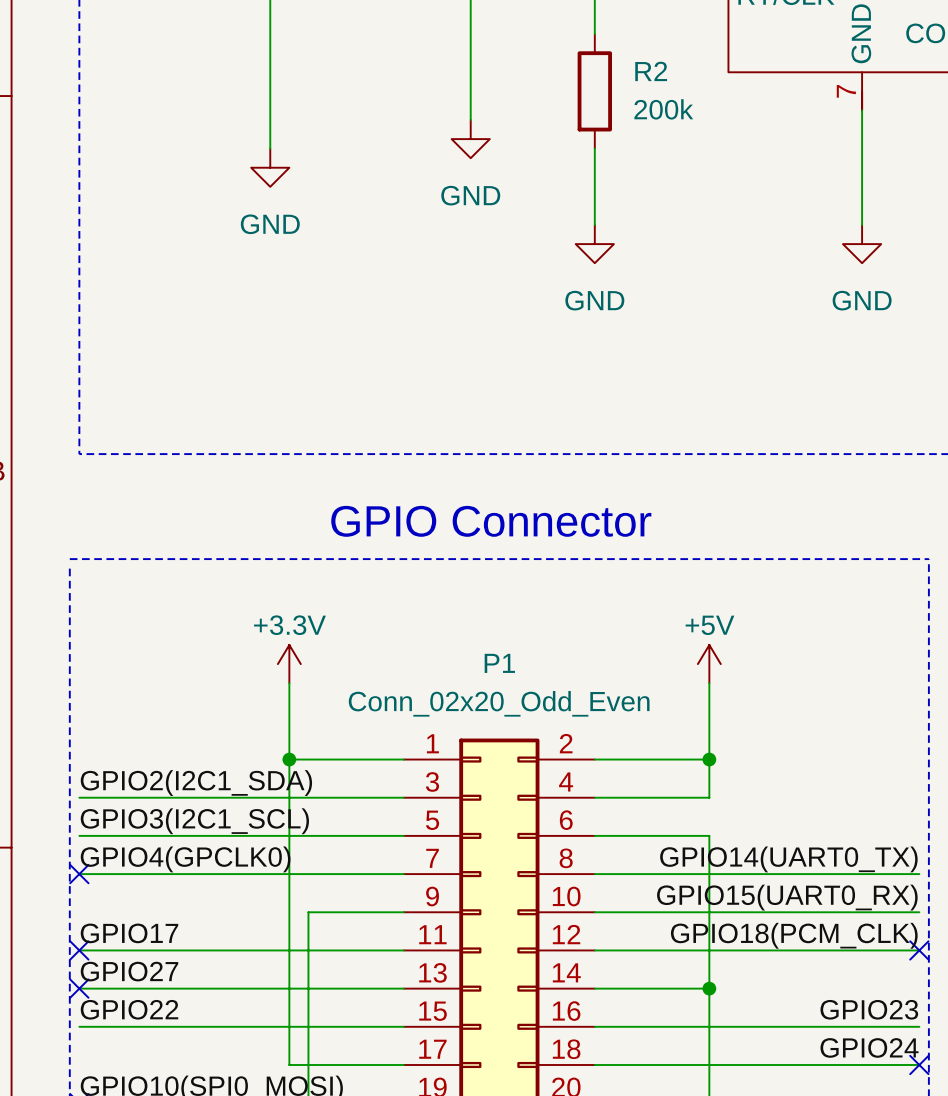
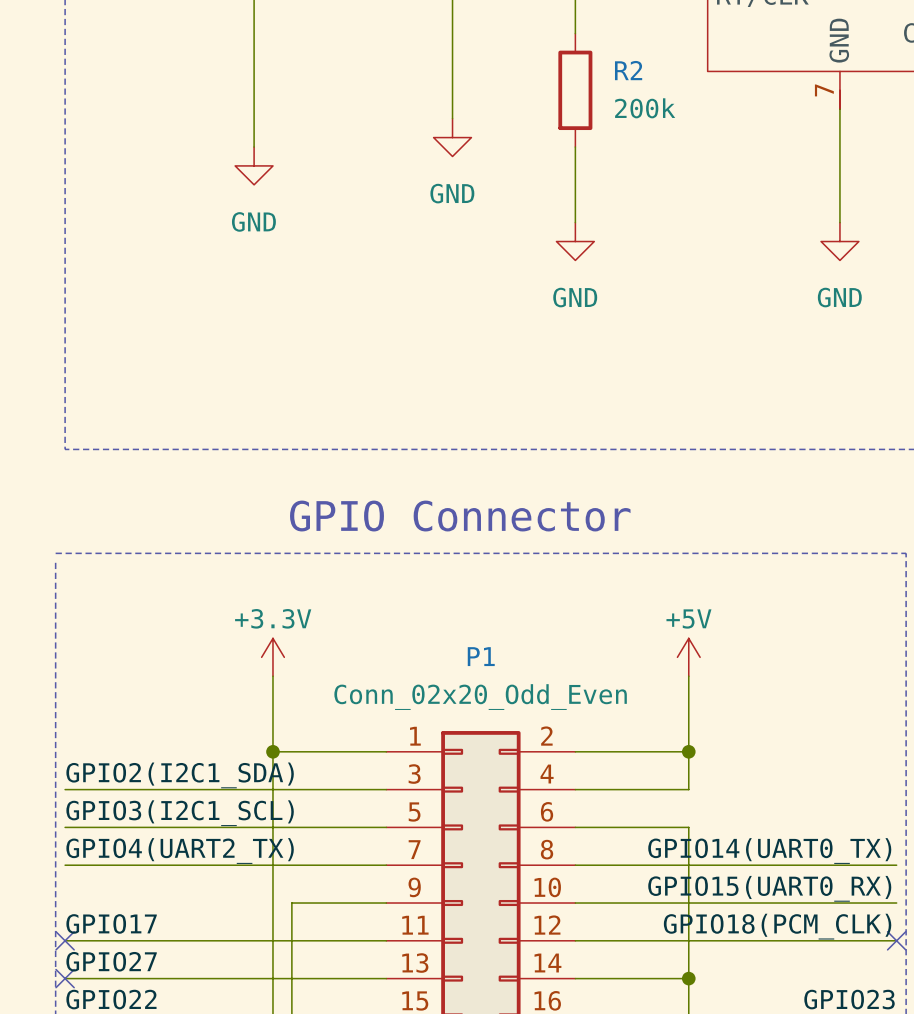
label: GPIO4(GPCLK0) (185, 859) -> GPIO4(UART2_TX) (180, 851)
no-connect mark: (79, 874) -> none

